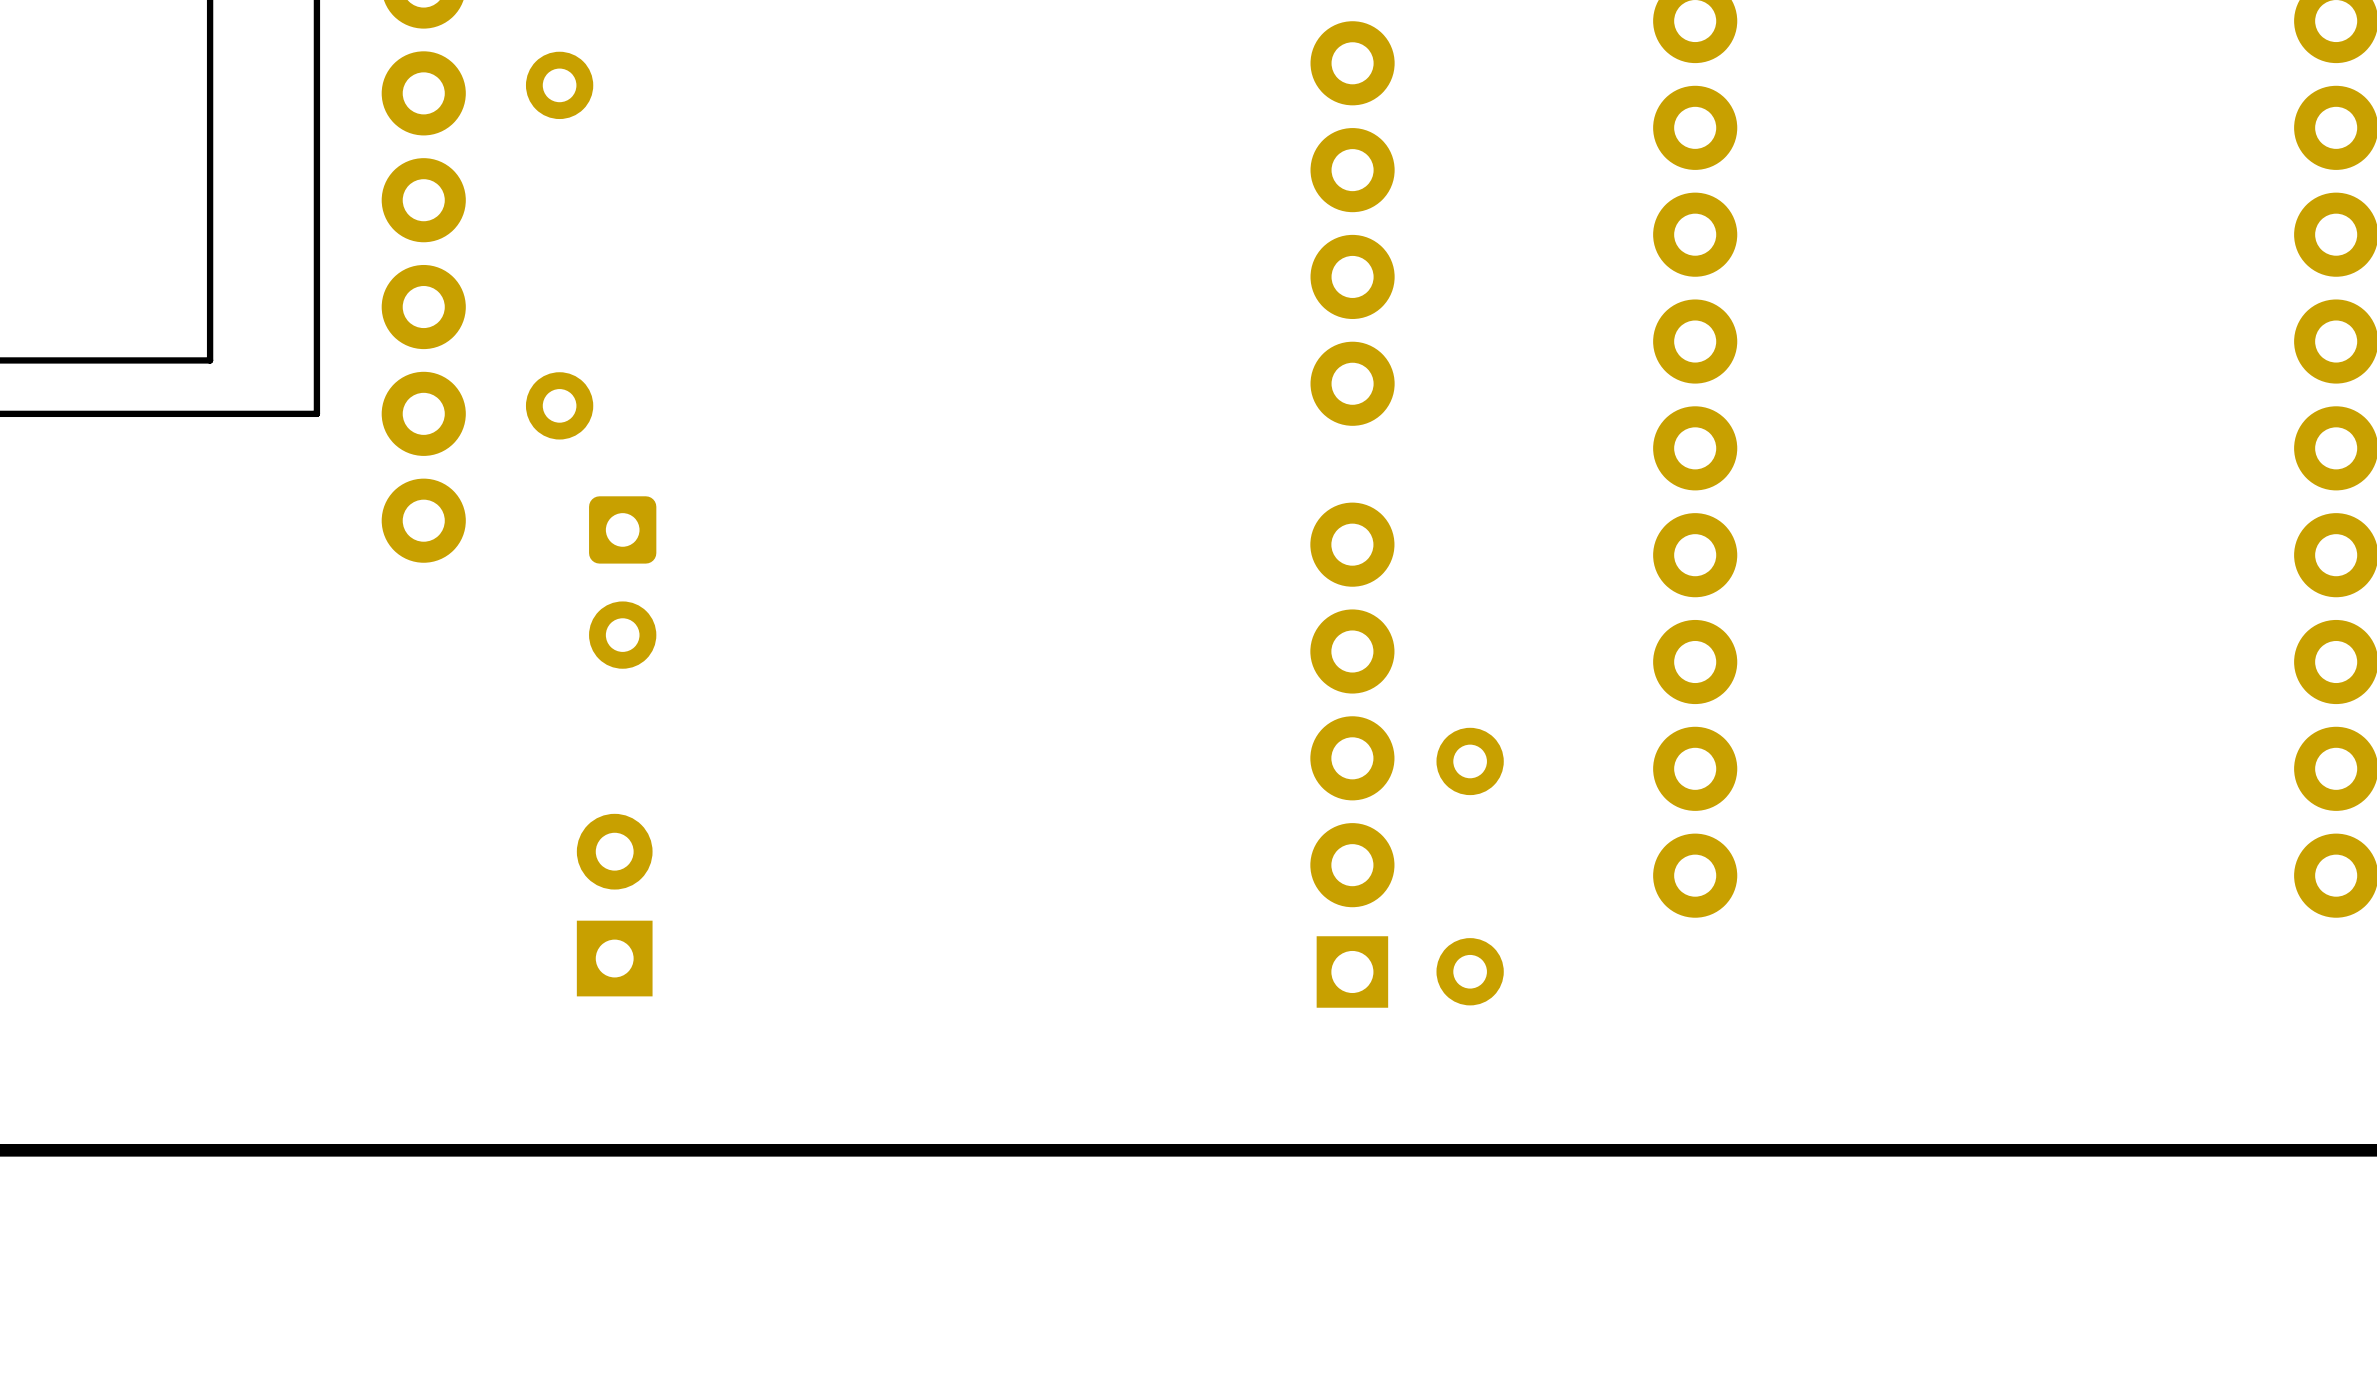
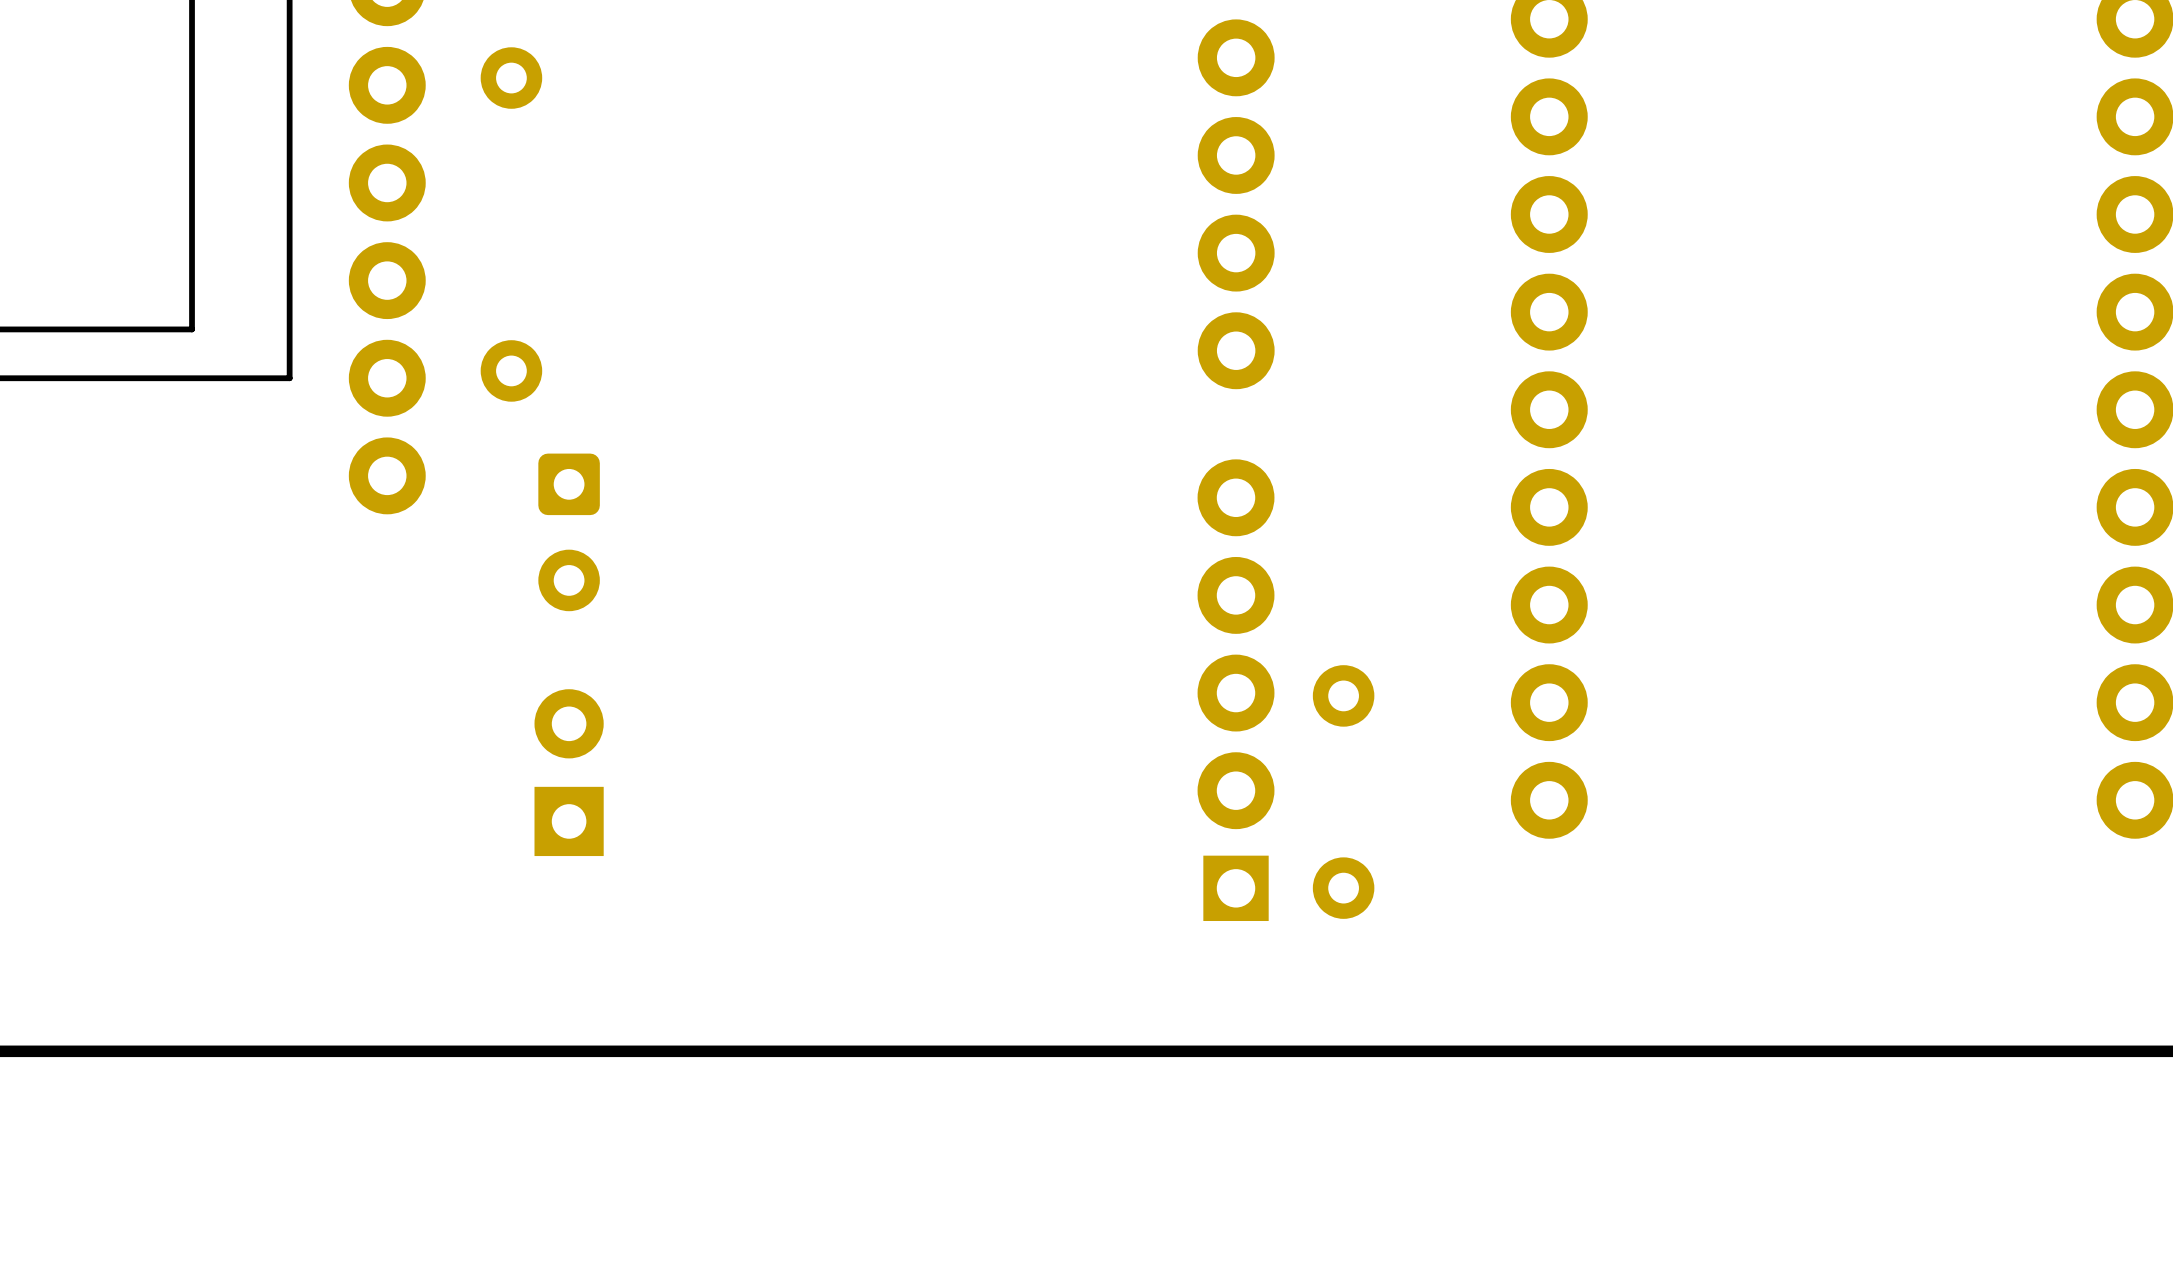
part position: (614, 905) -> (569, 772)

